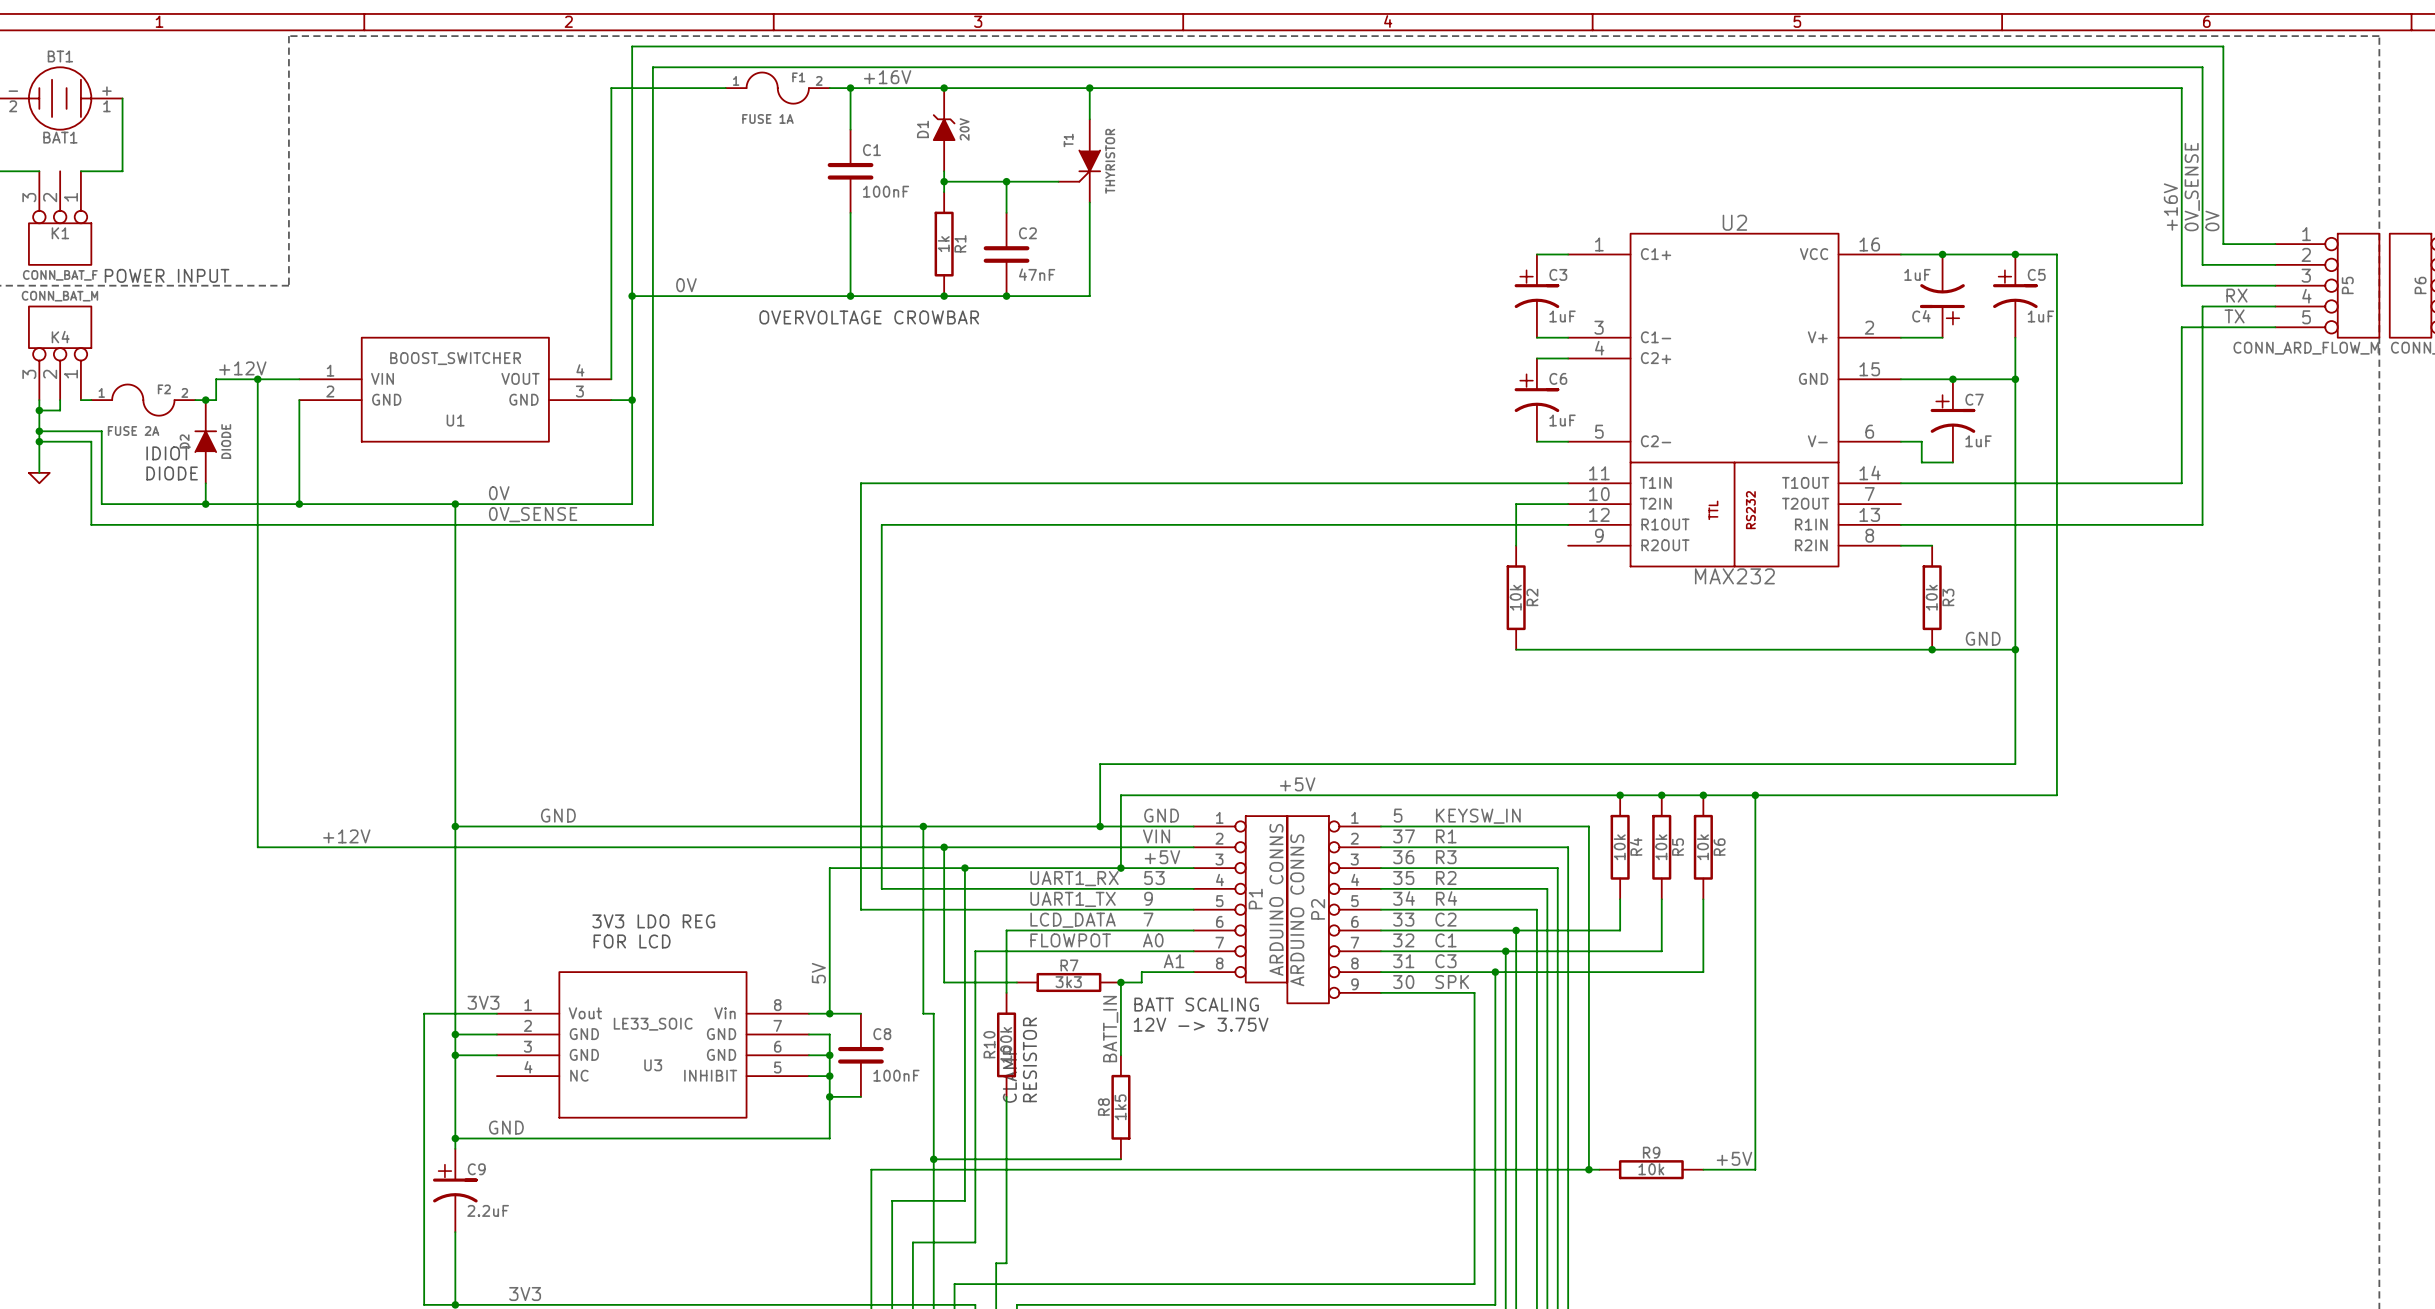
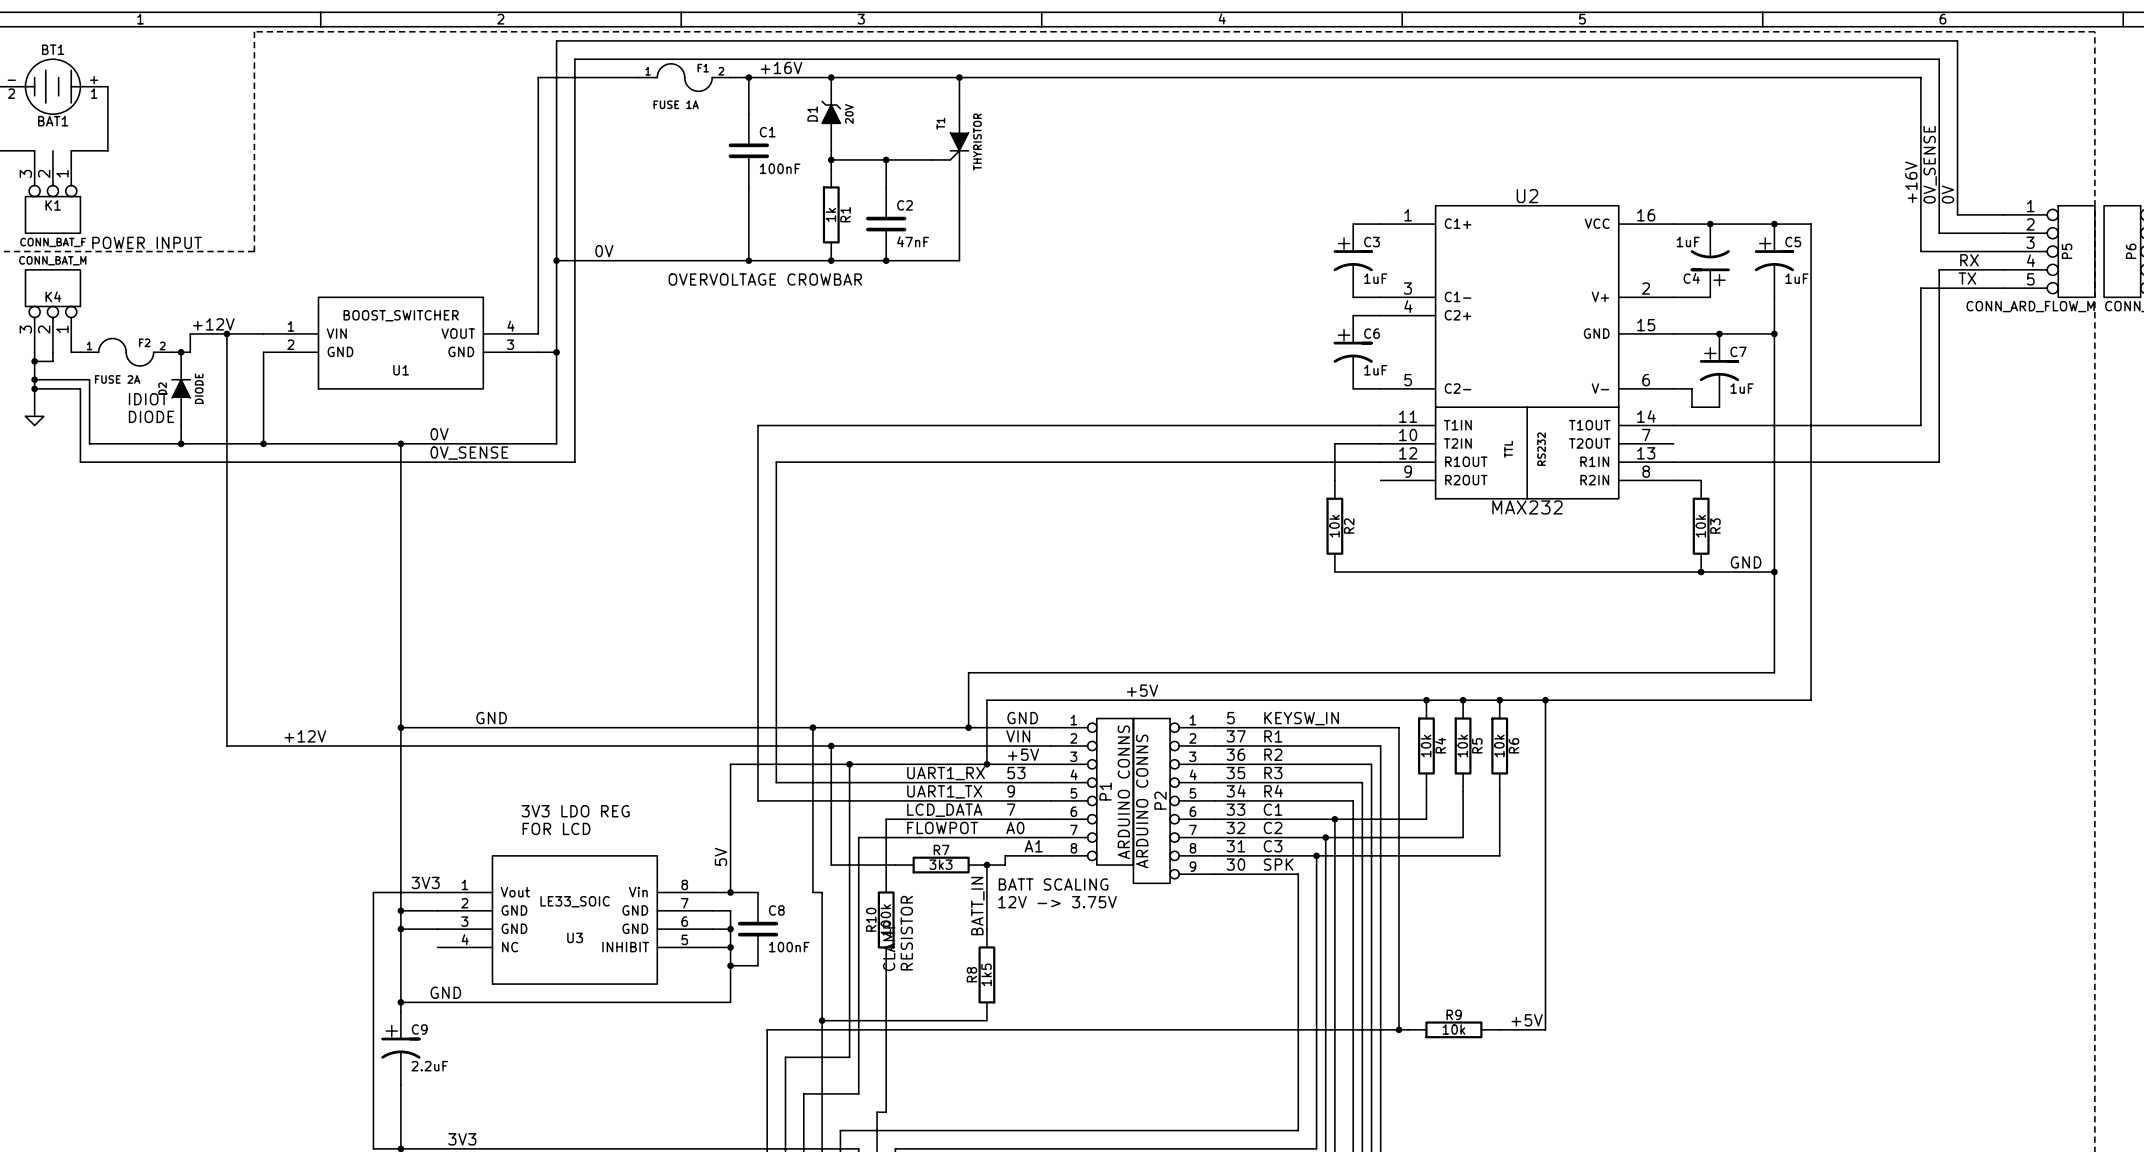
label: R3 (1446, 857) -> R2 (1273, 754)
label: R2 (1446, 878) -> R3 (1273, 773)
label: C2 (1445, 919) -> C1 (1273, 809)
label: C1 (1445, 940) -> C2 (1273, 827)

